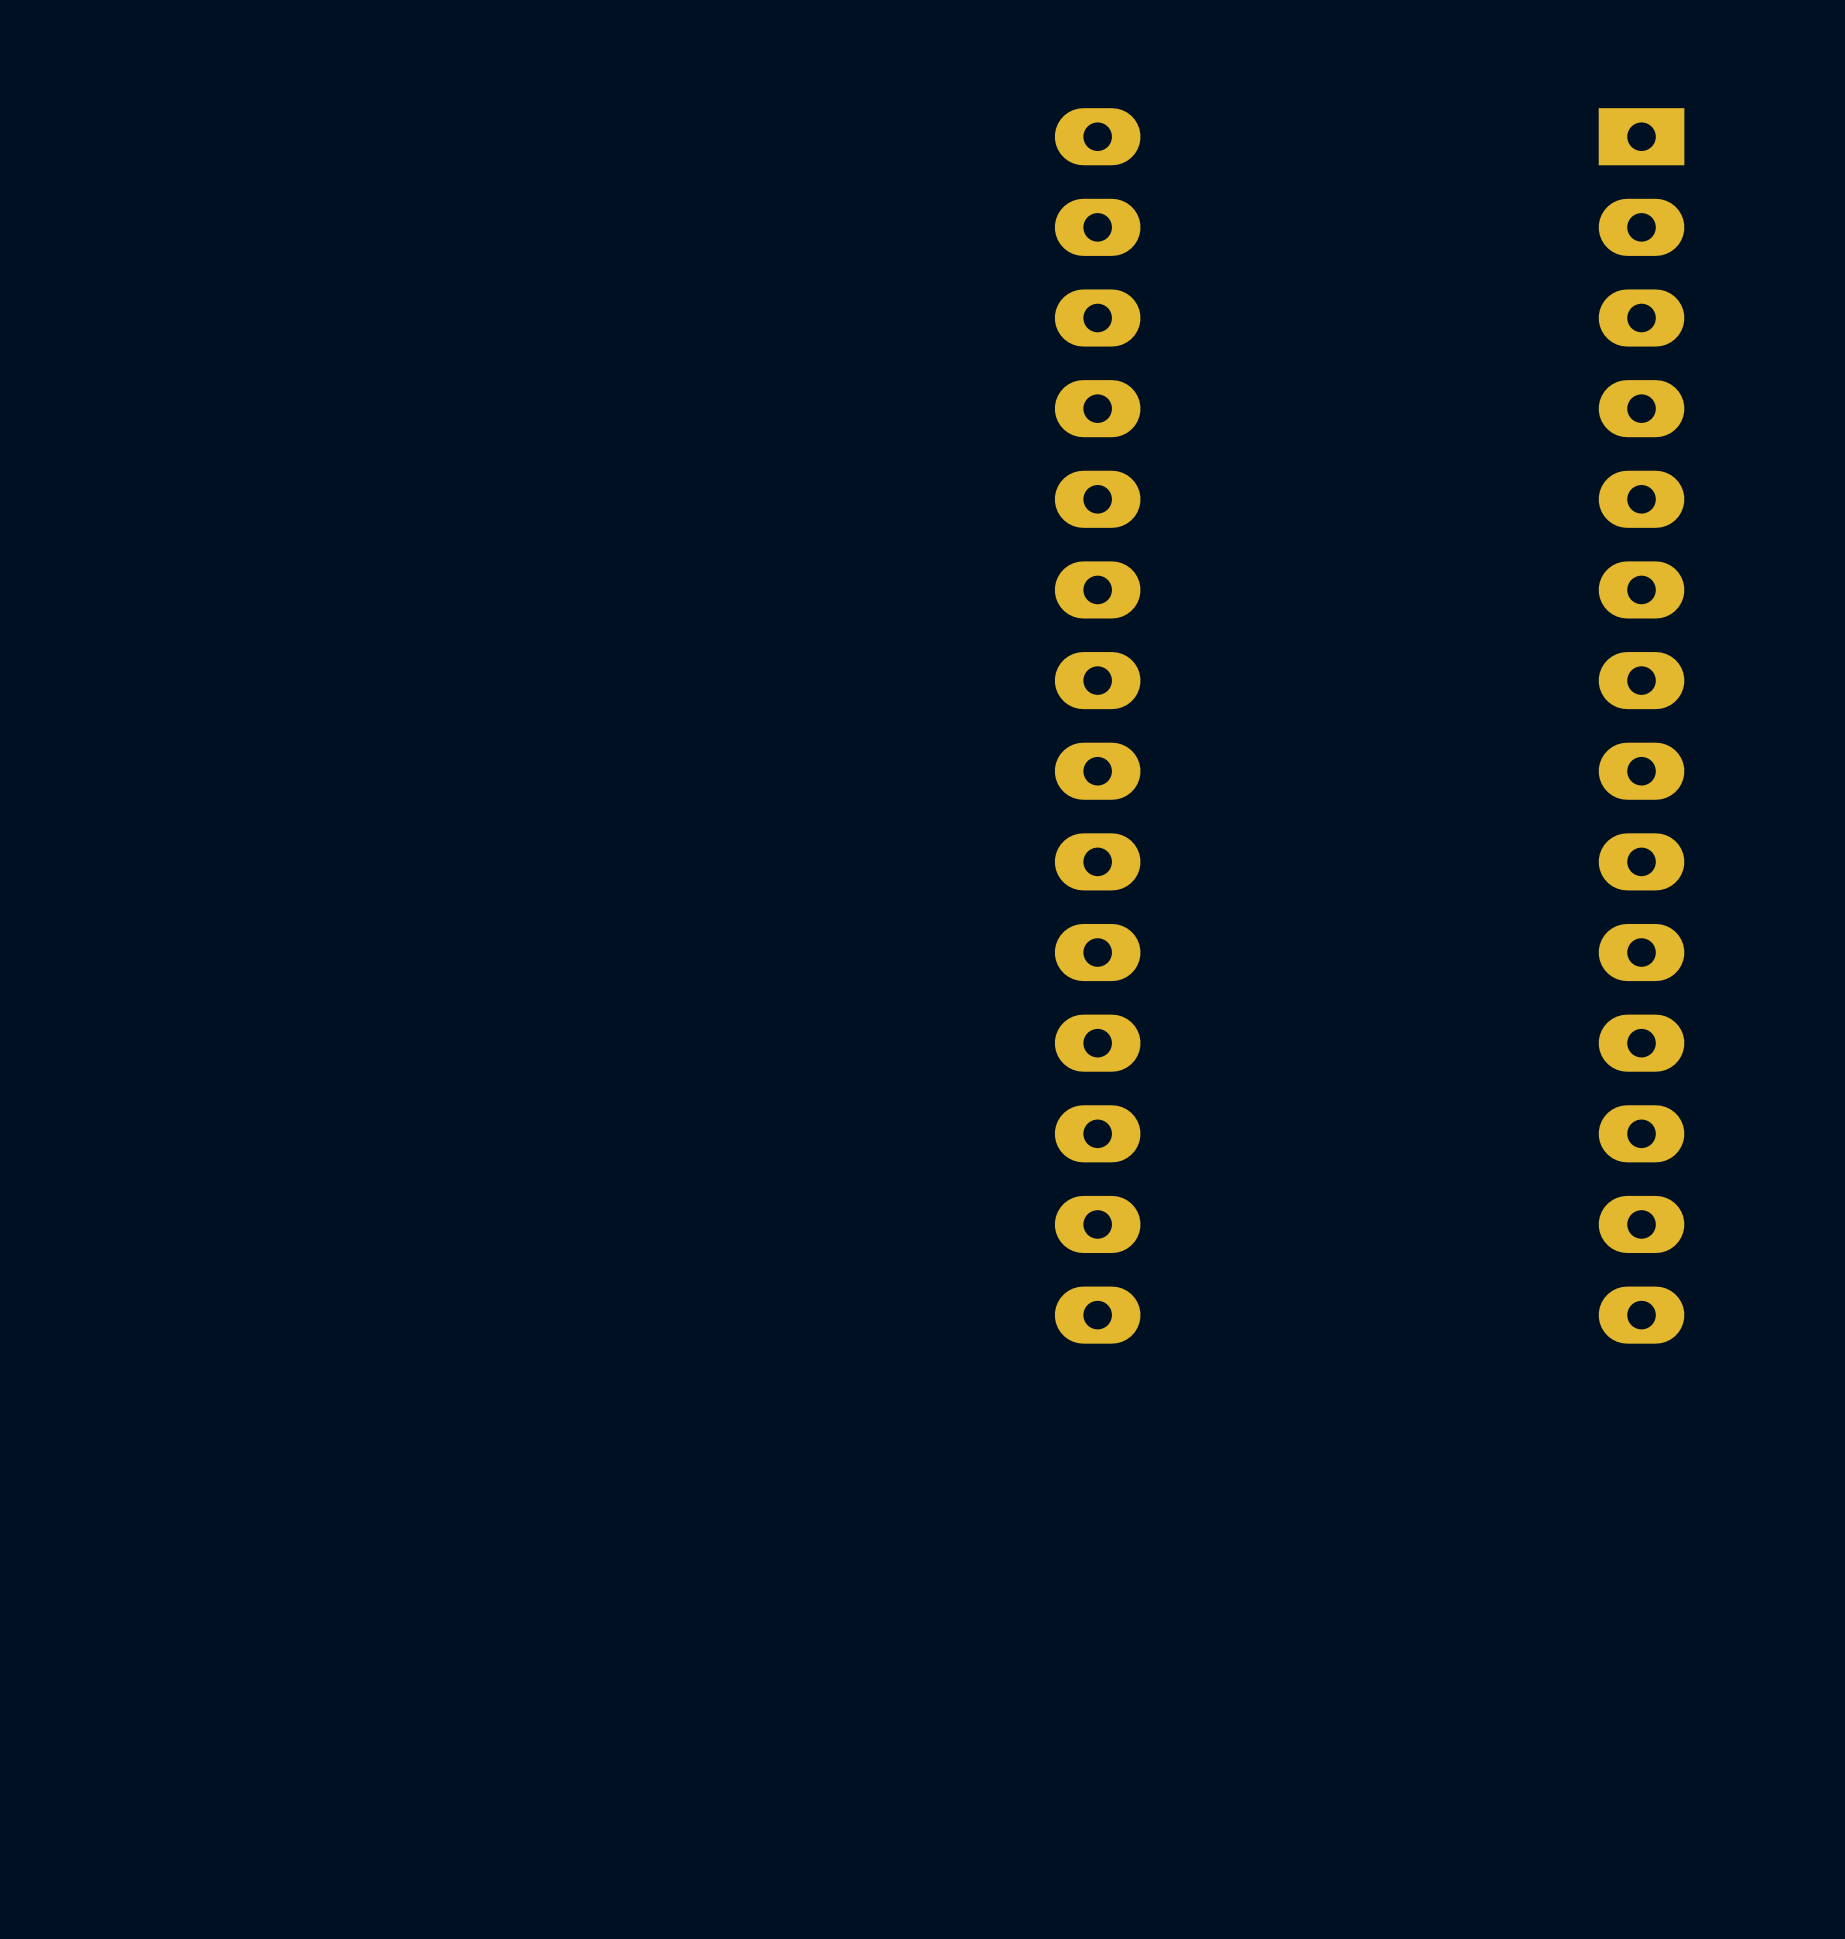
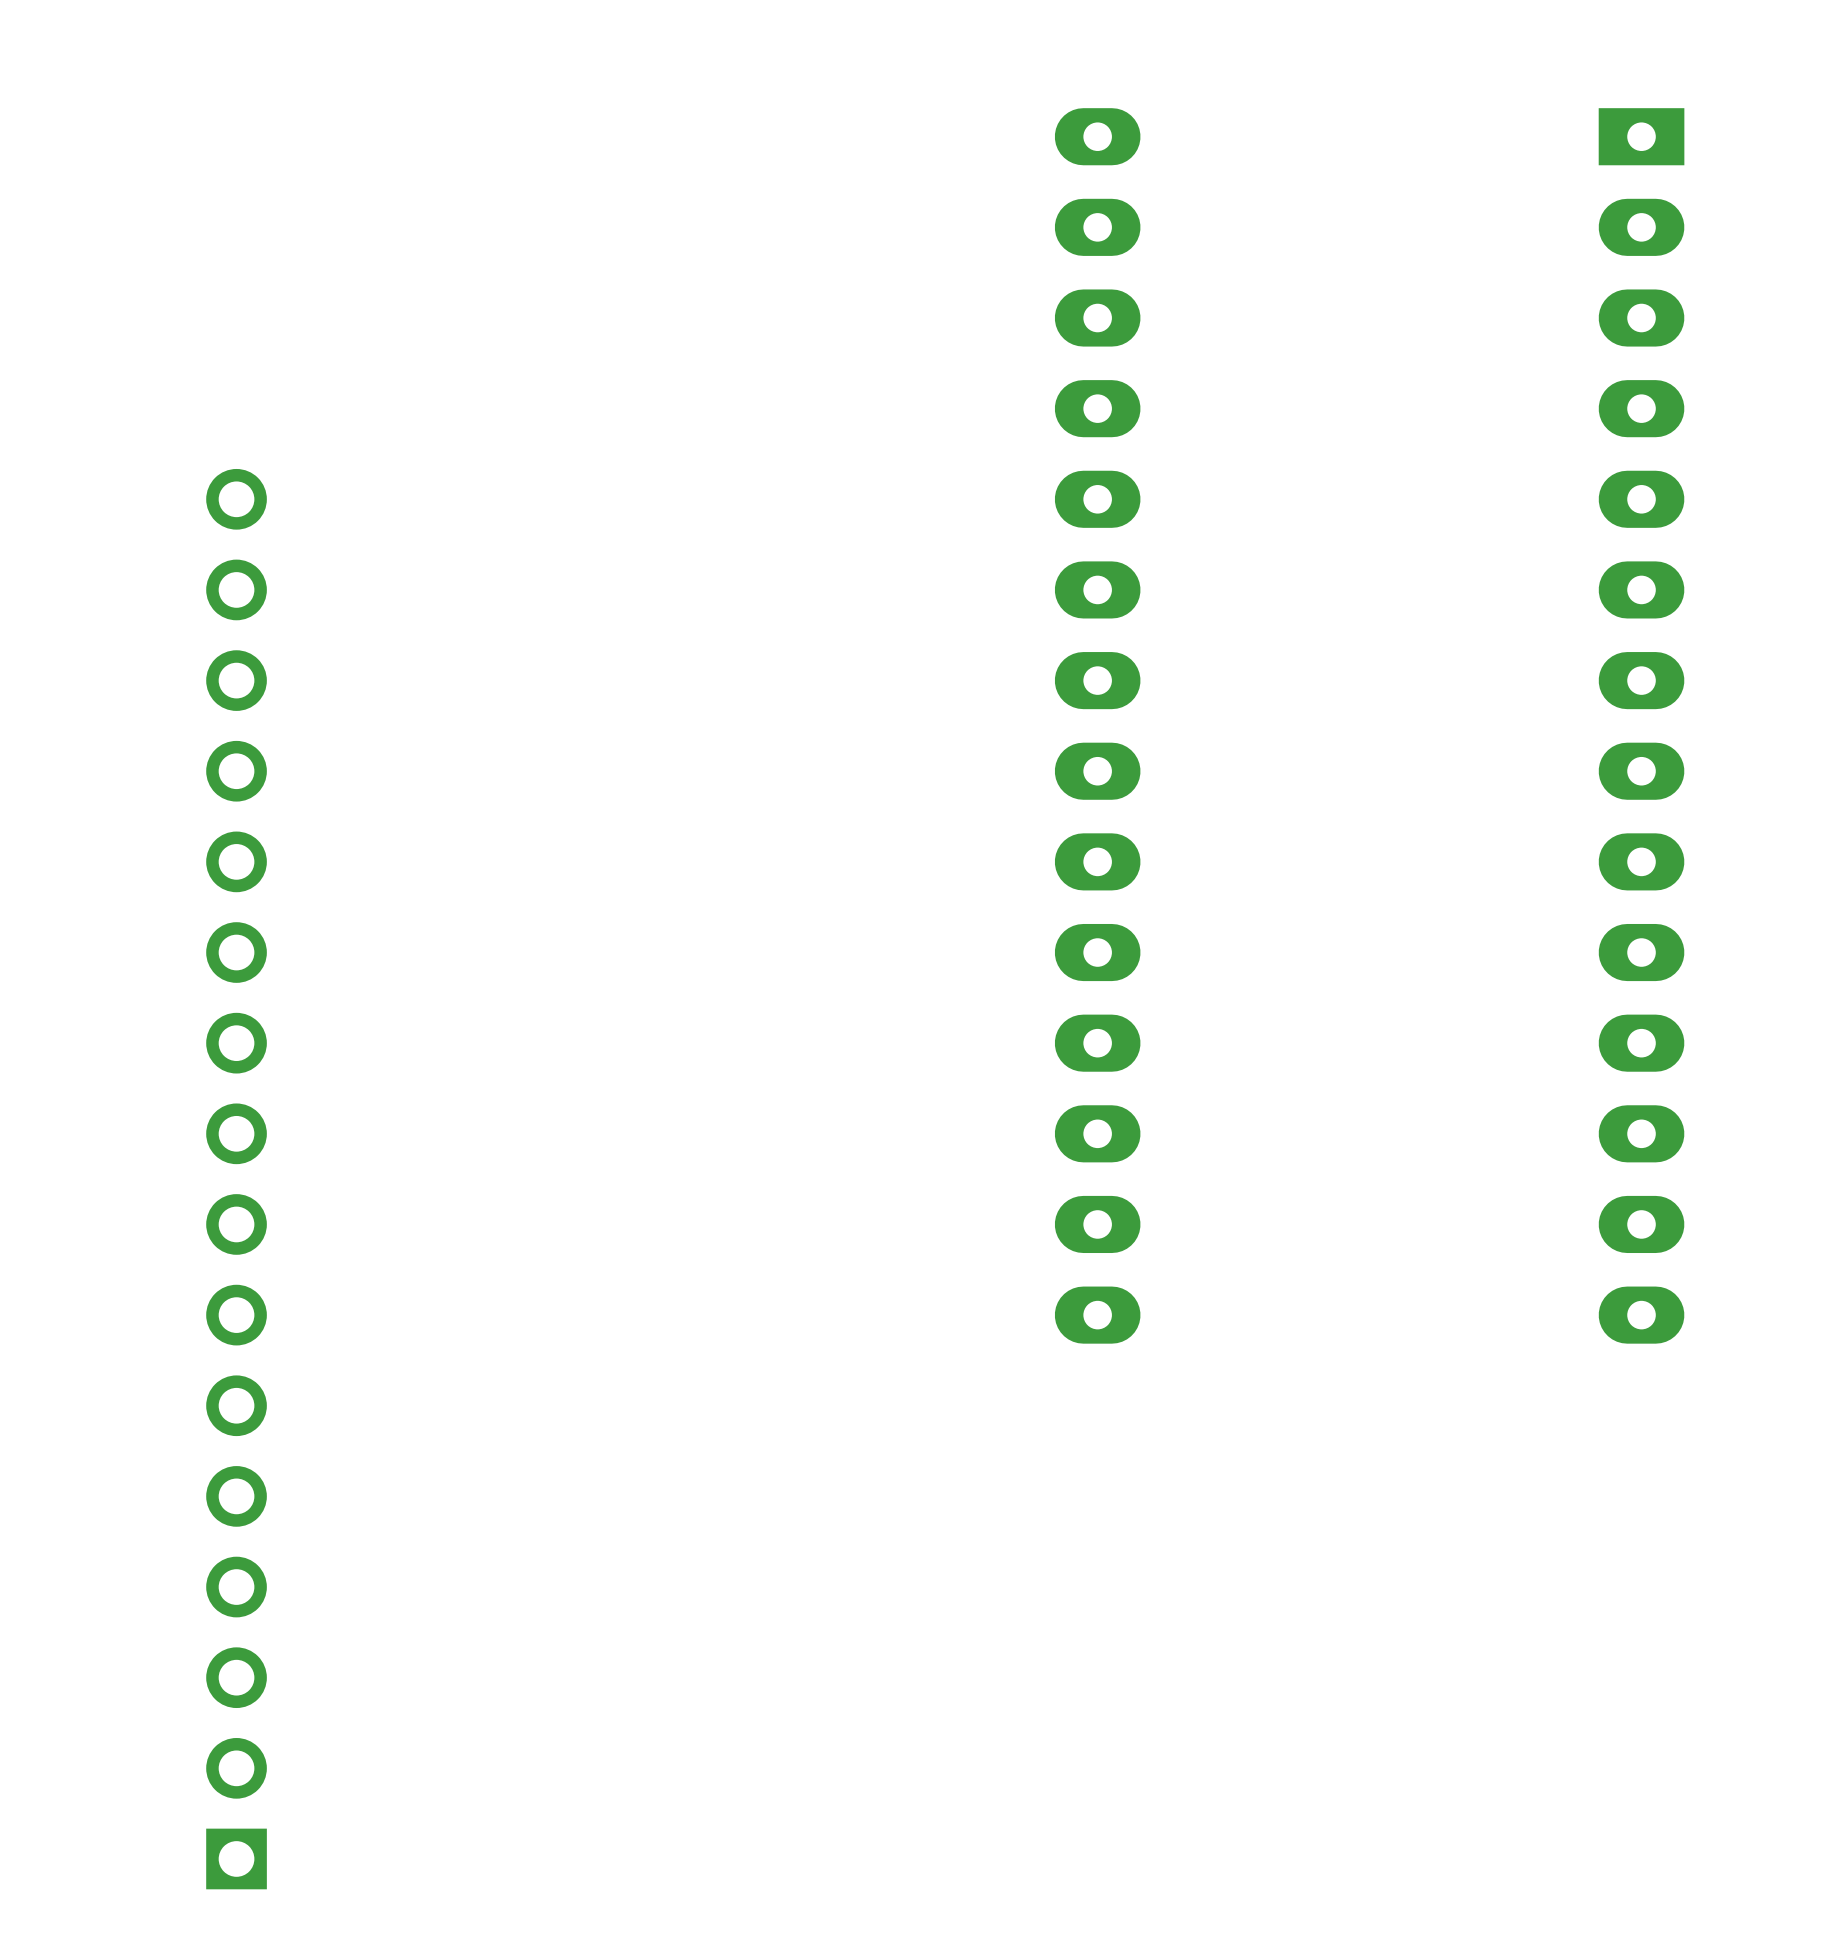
part: none -> (236, 1179)

